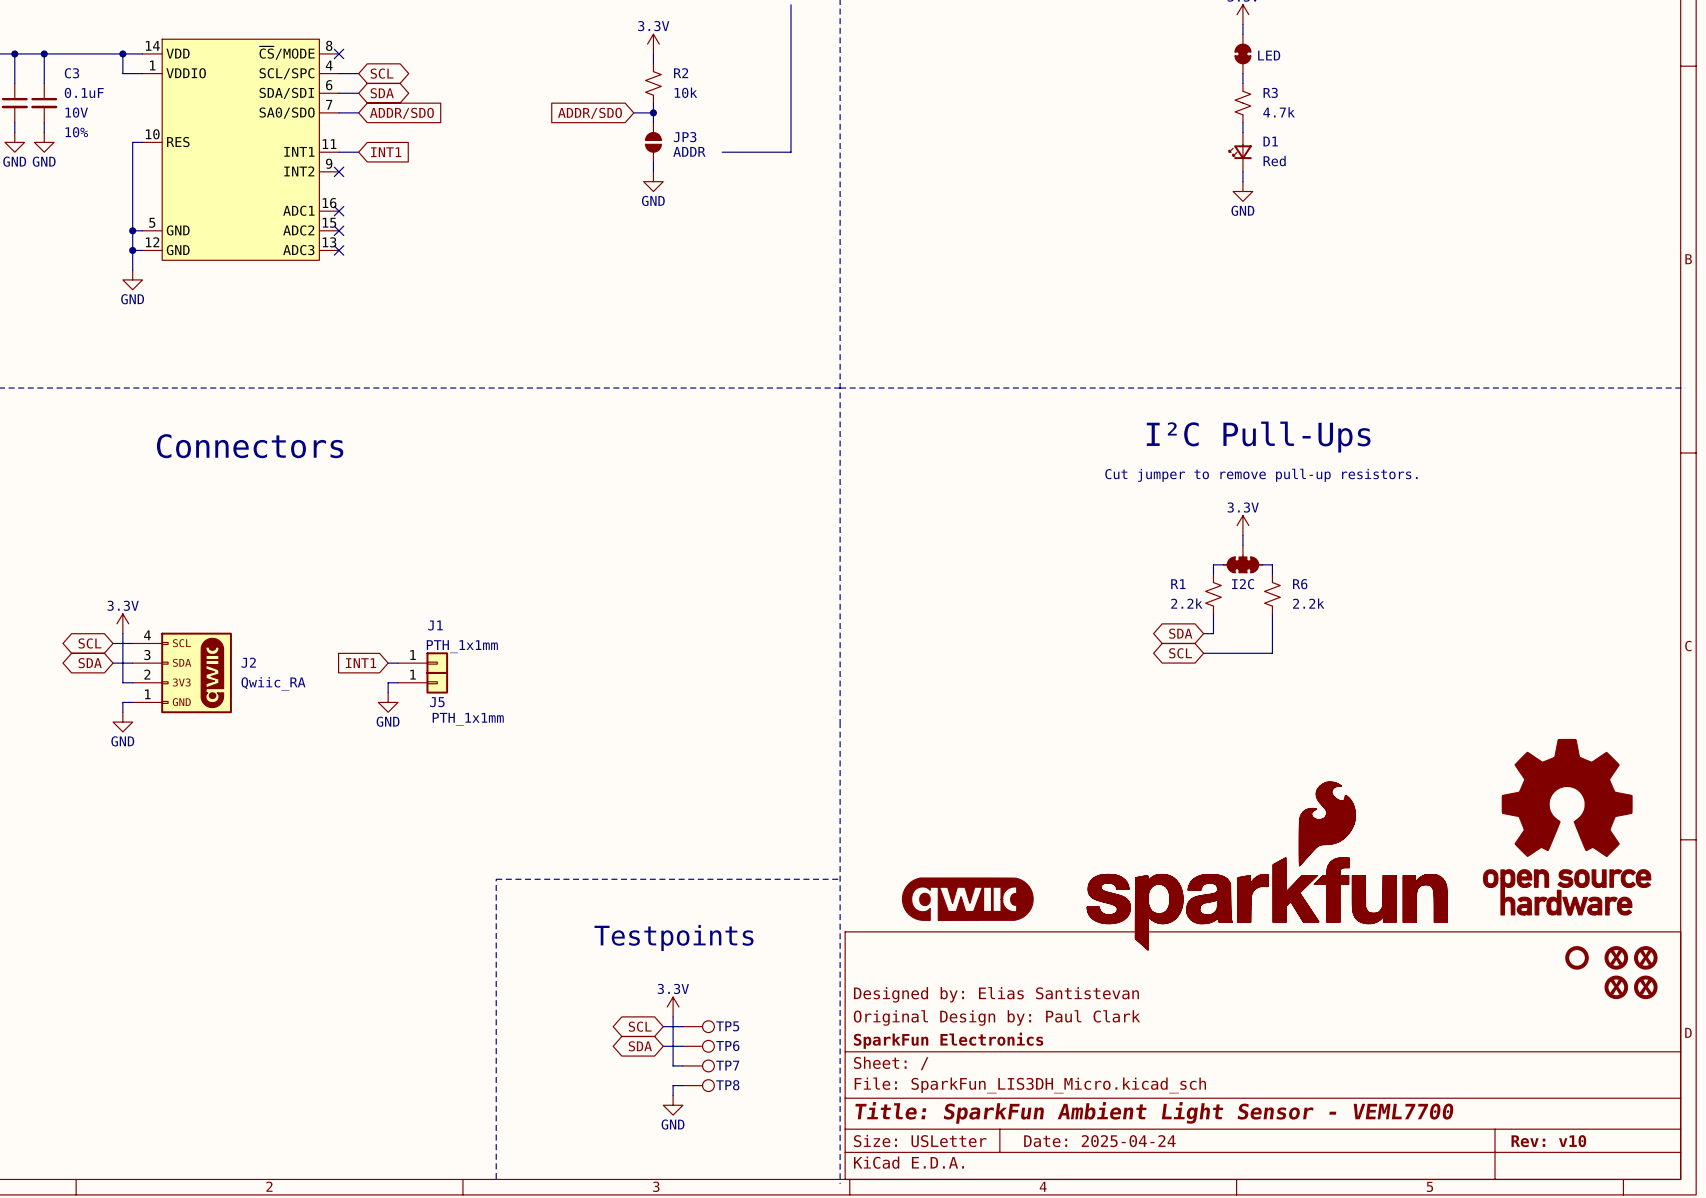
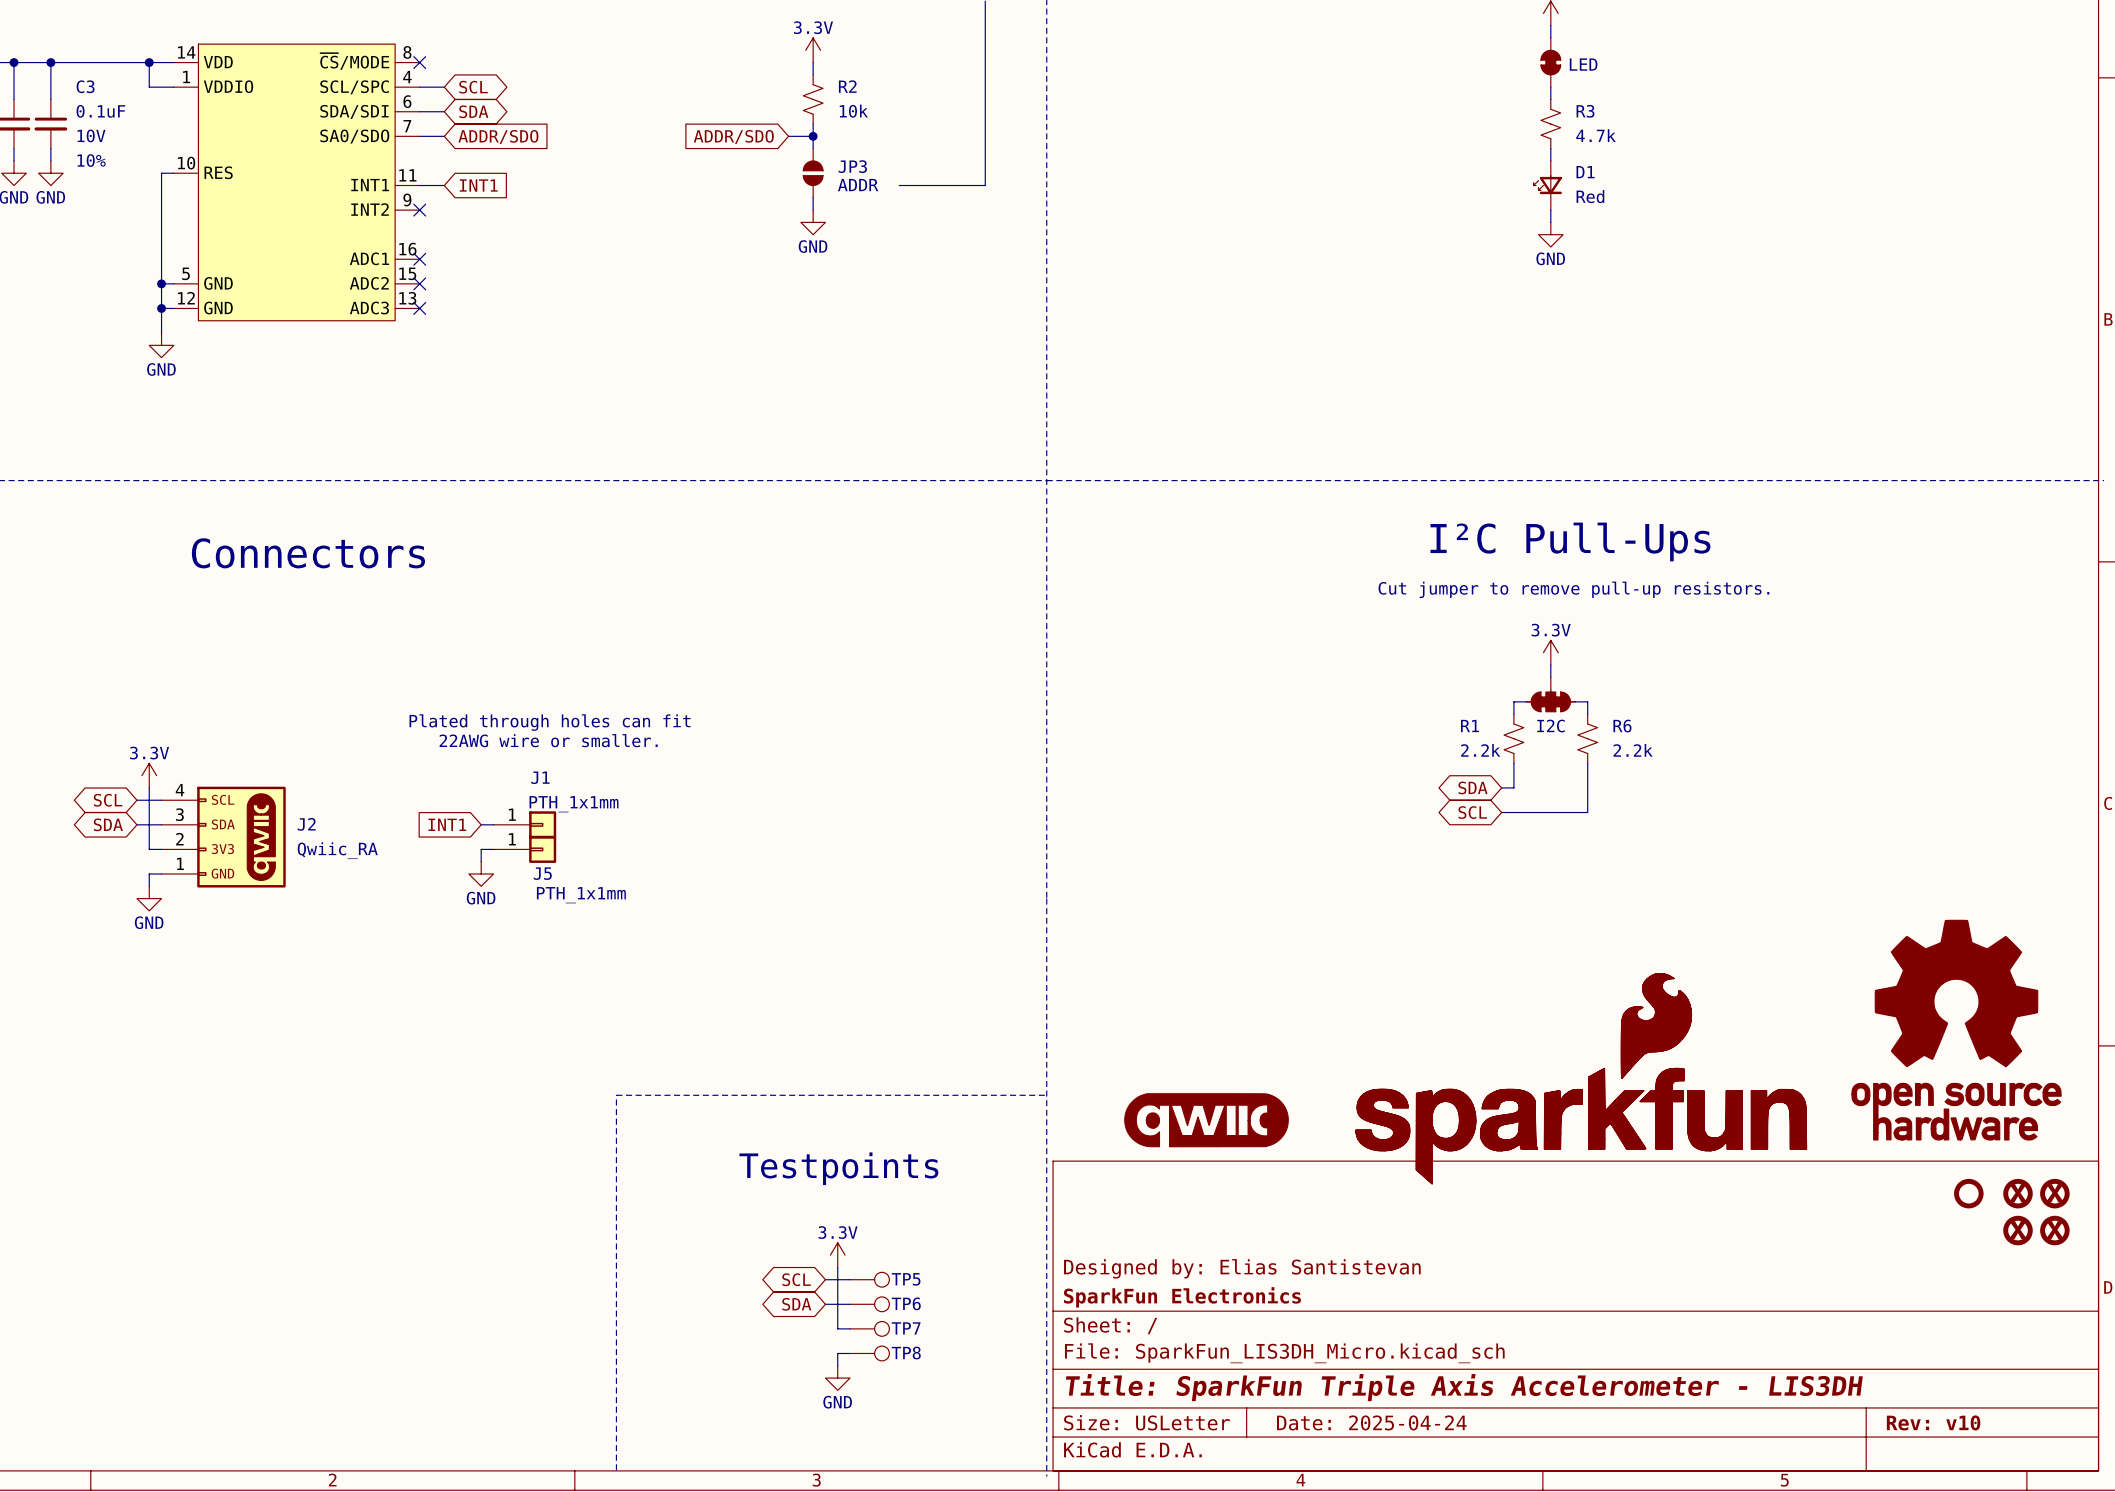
text: none -> Plated through holes can fit (550, 722)
text: none -> 22AWG wire or smaller. (548, 740)
title block: Designed by: Elias Santistevan (996, 994) -> none
title block: Original Design by: Paul Clark (996, 1017) -> Designed by: Elias Santistevan (1242, 1268)
title block: Title: SparkFun Ambient Light Sensor - VEML7700 (1154, 1112) -> Title: SparkFun Triple Axis Accelerometer - LIS3DH (1464, 1387)

